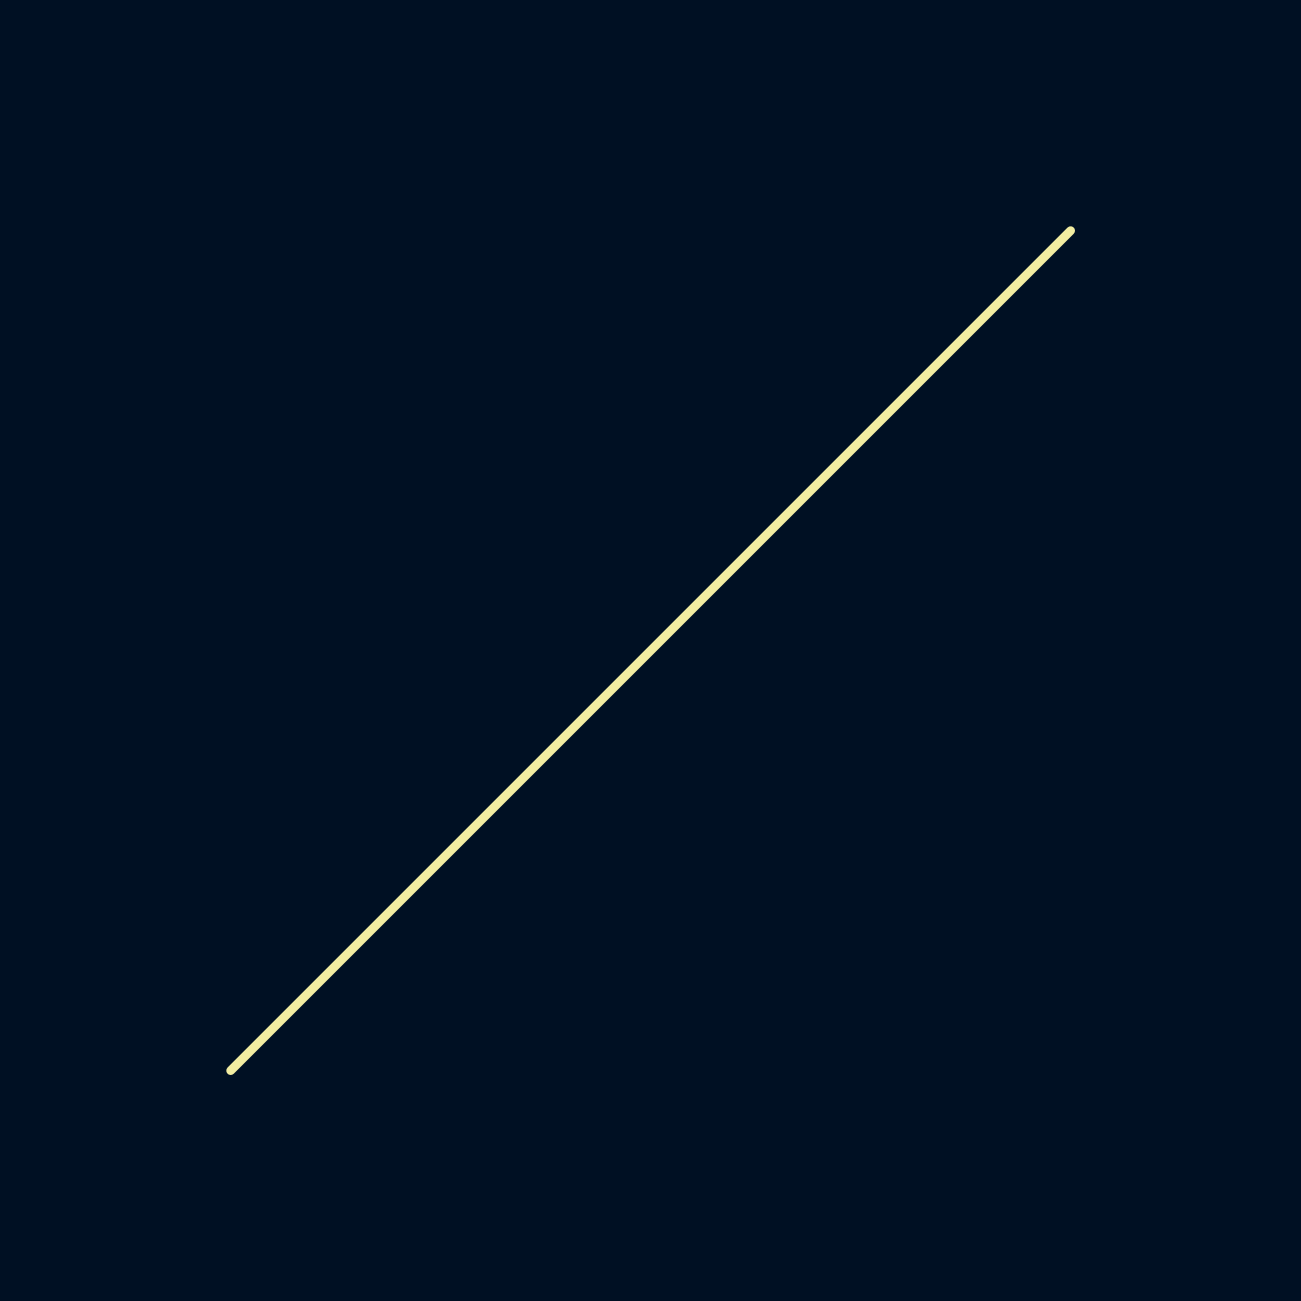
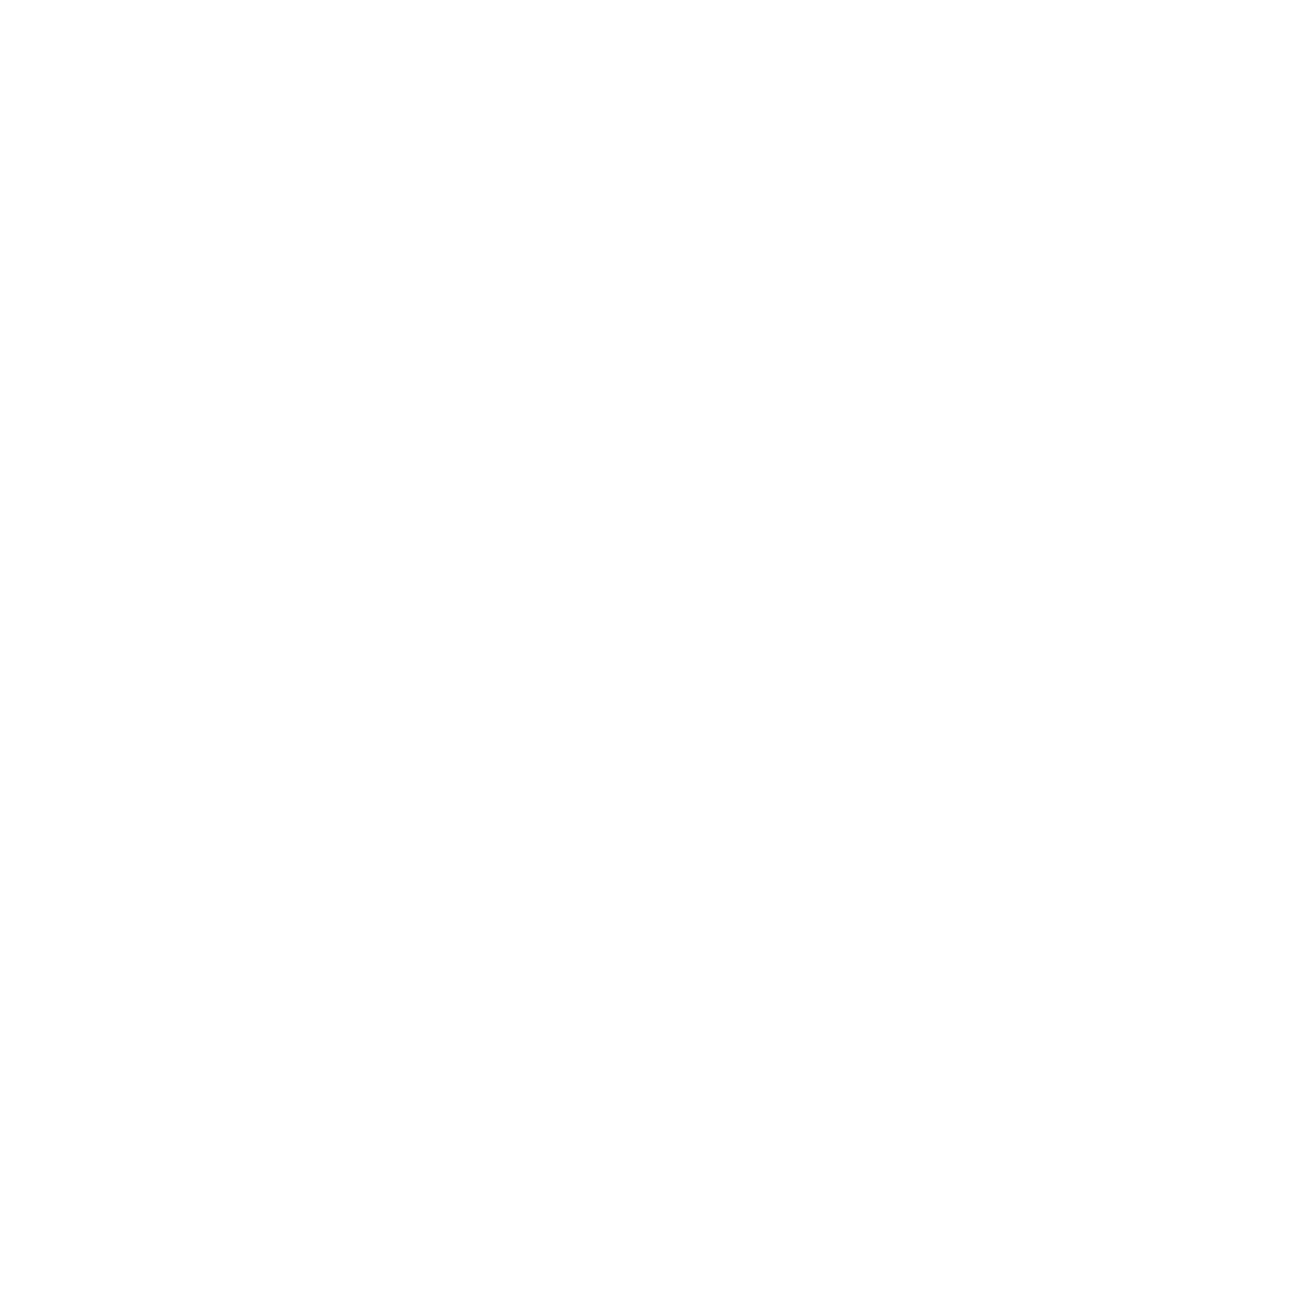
line: (1070, 230) (230, 1070) -> none

